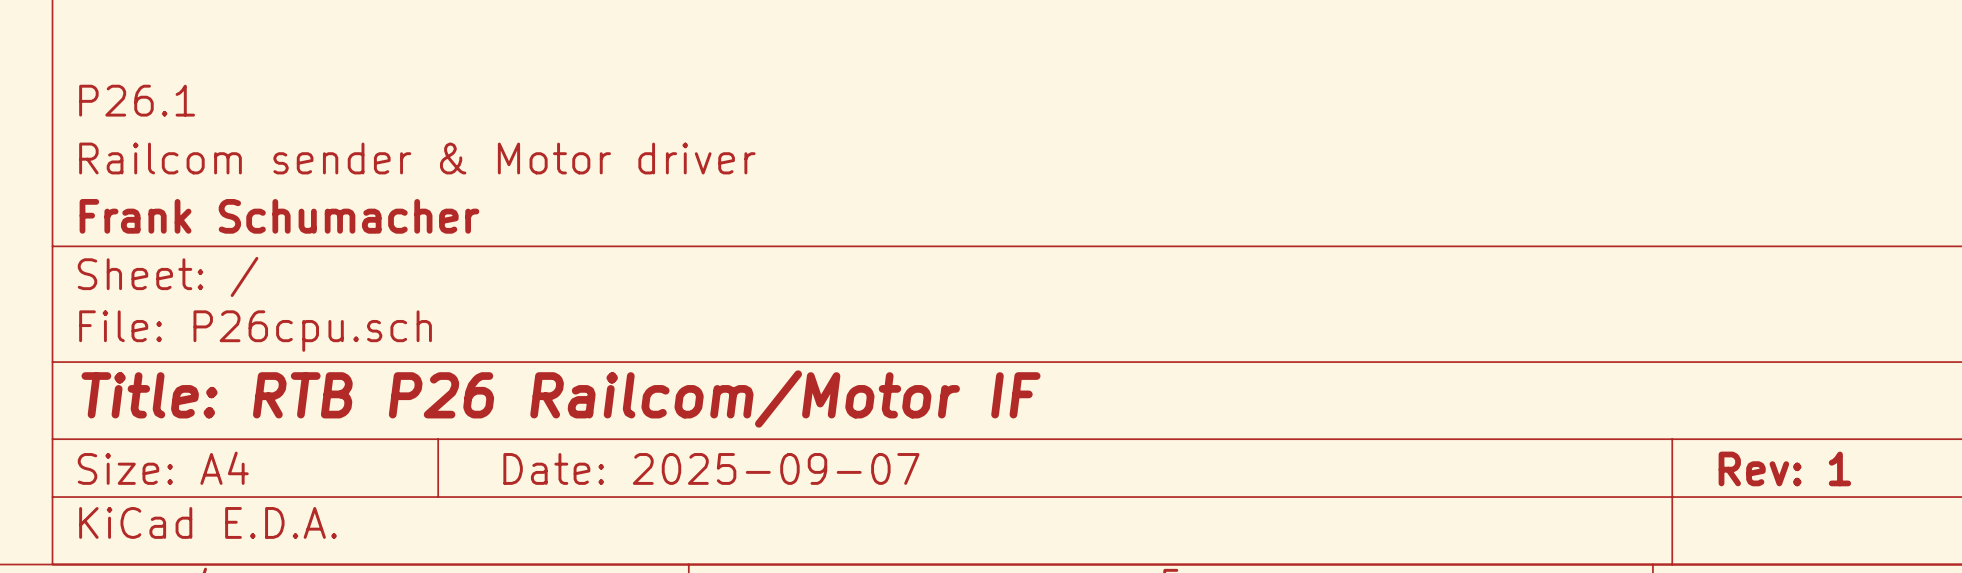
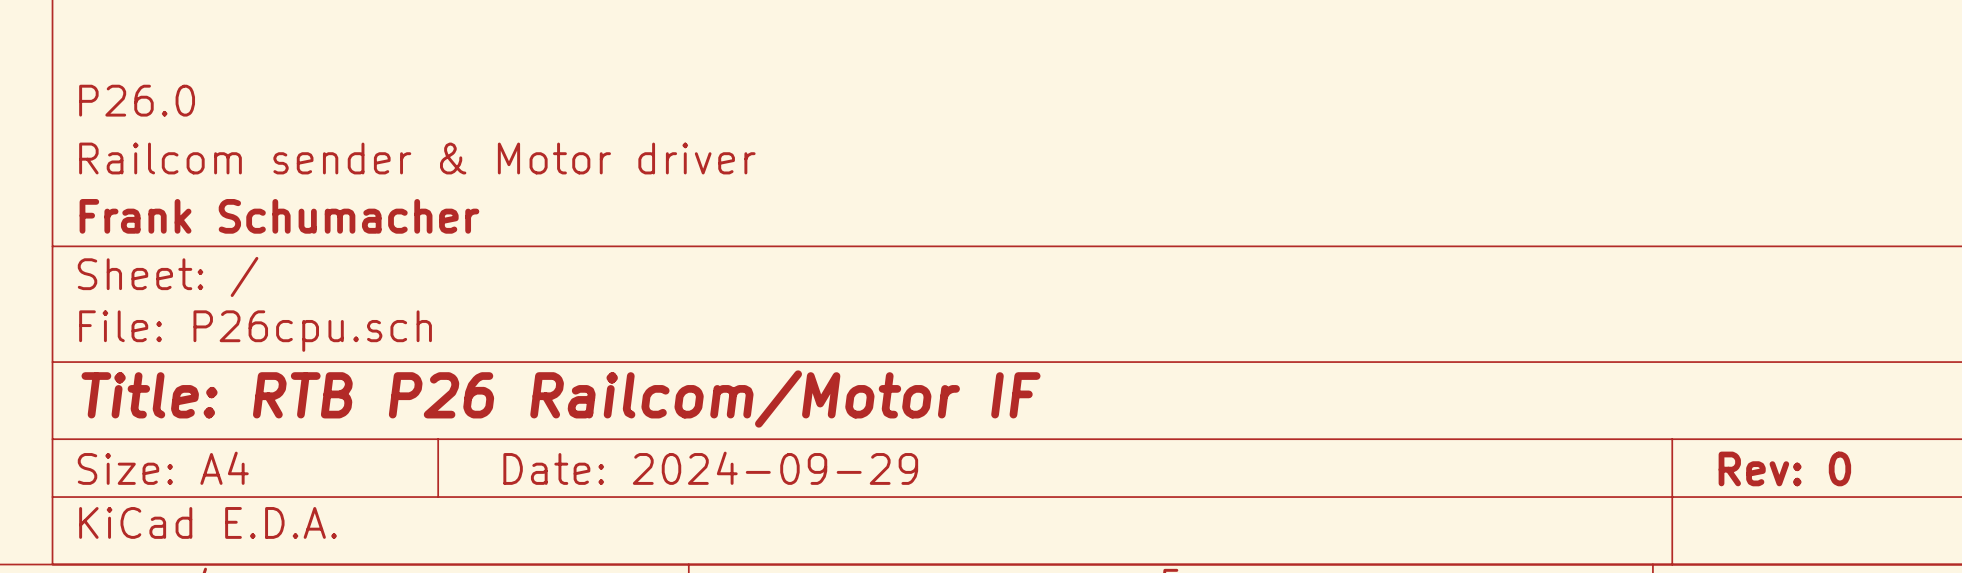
title block: P26.1 (137, 100) -> P26.0 (137, 100)
title block: Date: 2025-09-07 (711, 468) -> Date: 2024-09-29 (710, 468)
title block: Rev: 1 (1784, 468) -> Rev: 0 (1784, 468)

